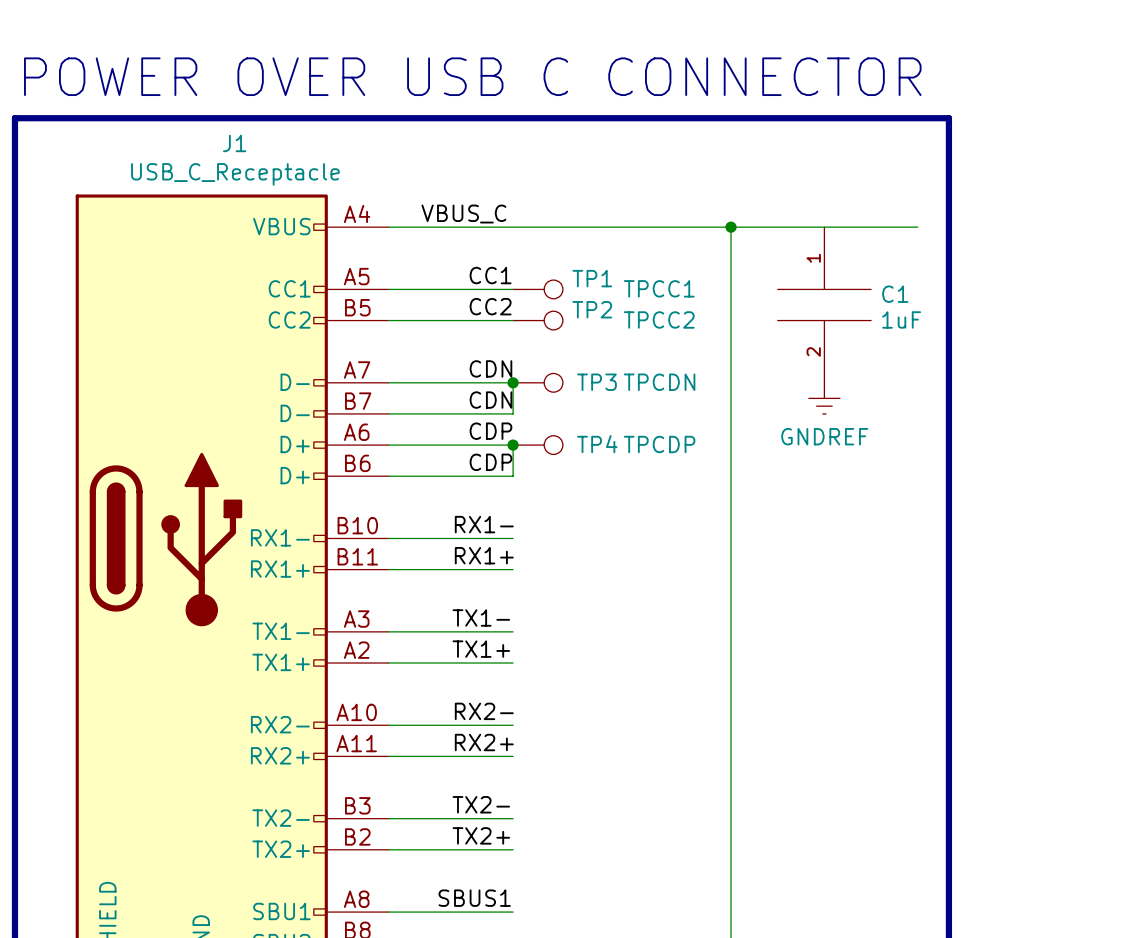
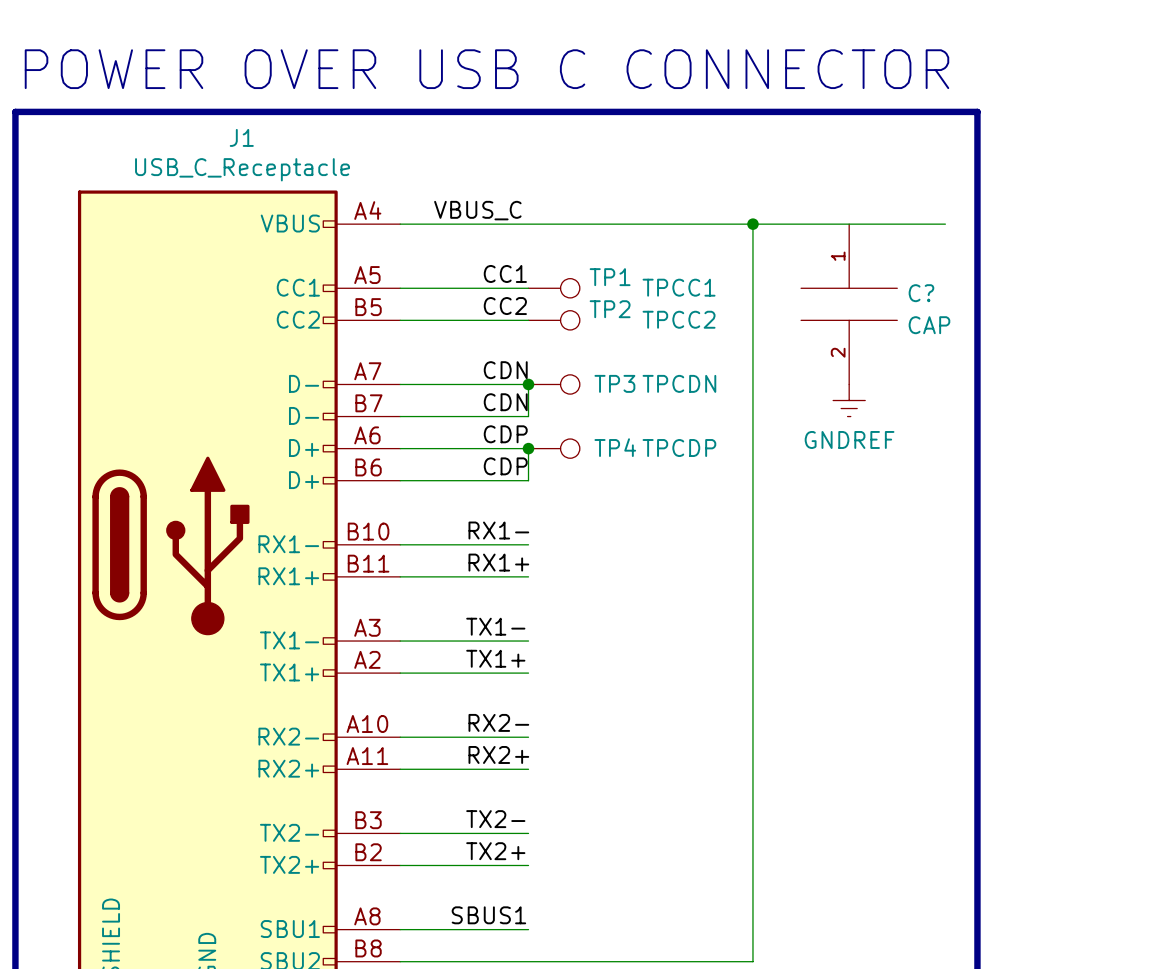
C1 name: C1 (895, 294) -> C? (921, 293)
C1 value: 1uF (901, 319) -> CAP (929, 325)

